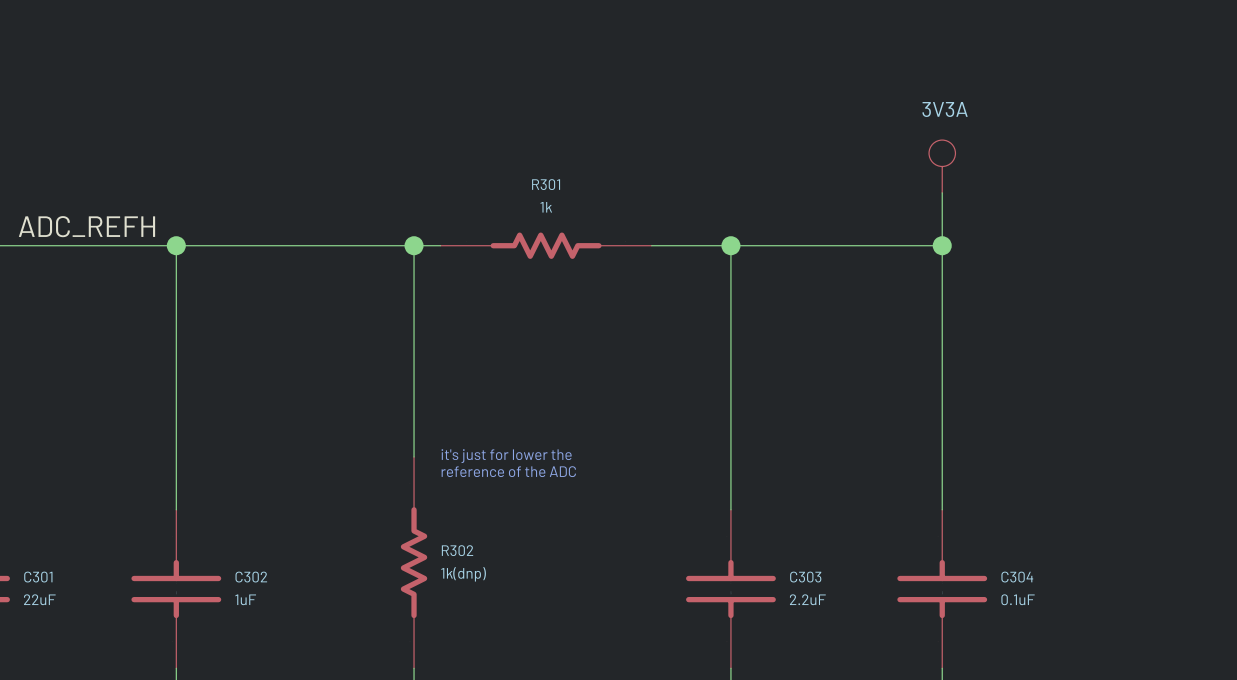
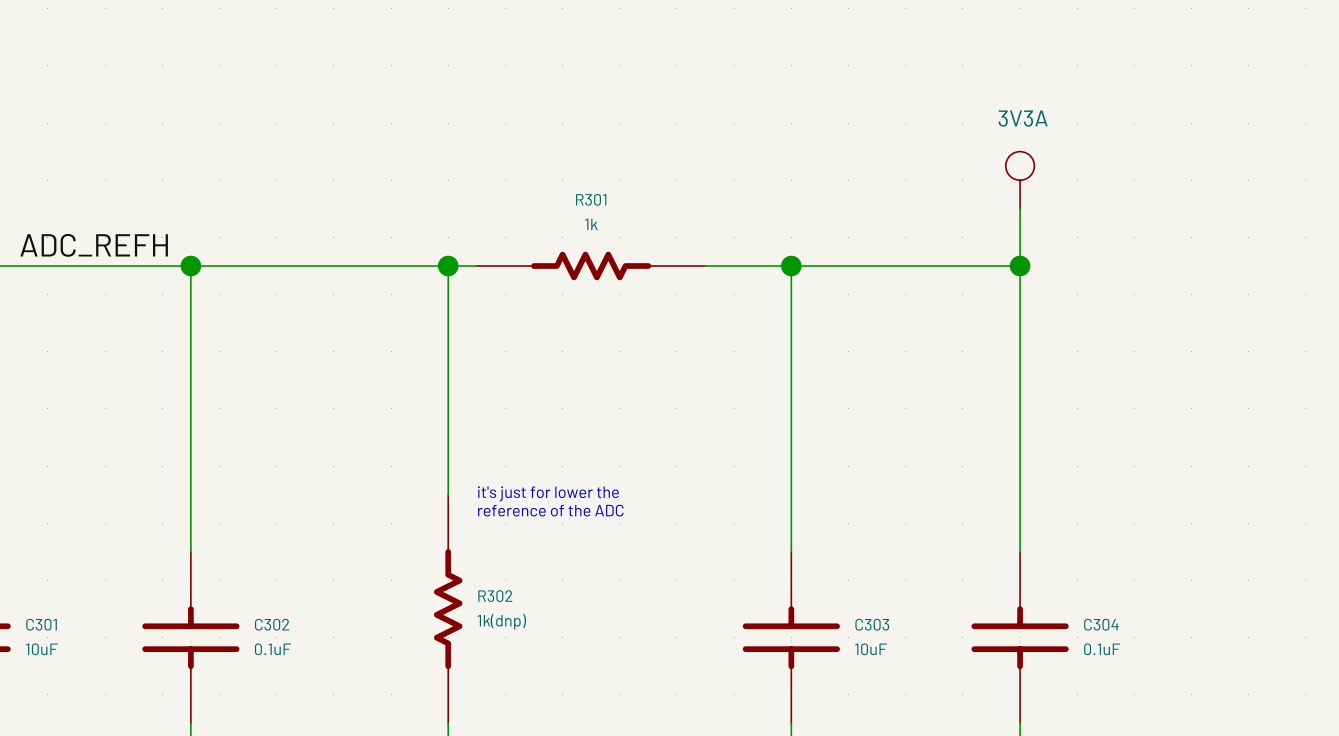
C301 value: 22uF (39, 599) -> 10uF (41, 649)
C302 value: 1uF (245, 599) -> 0.1uF (272, 649)
C303 value: 2.2uF (807, 599) -> 10uF (871, 649)

